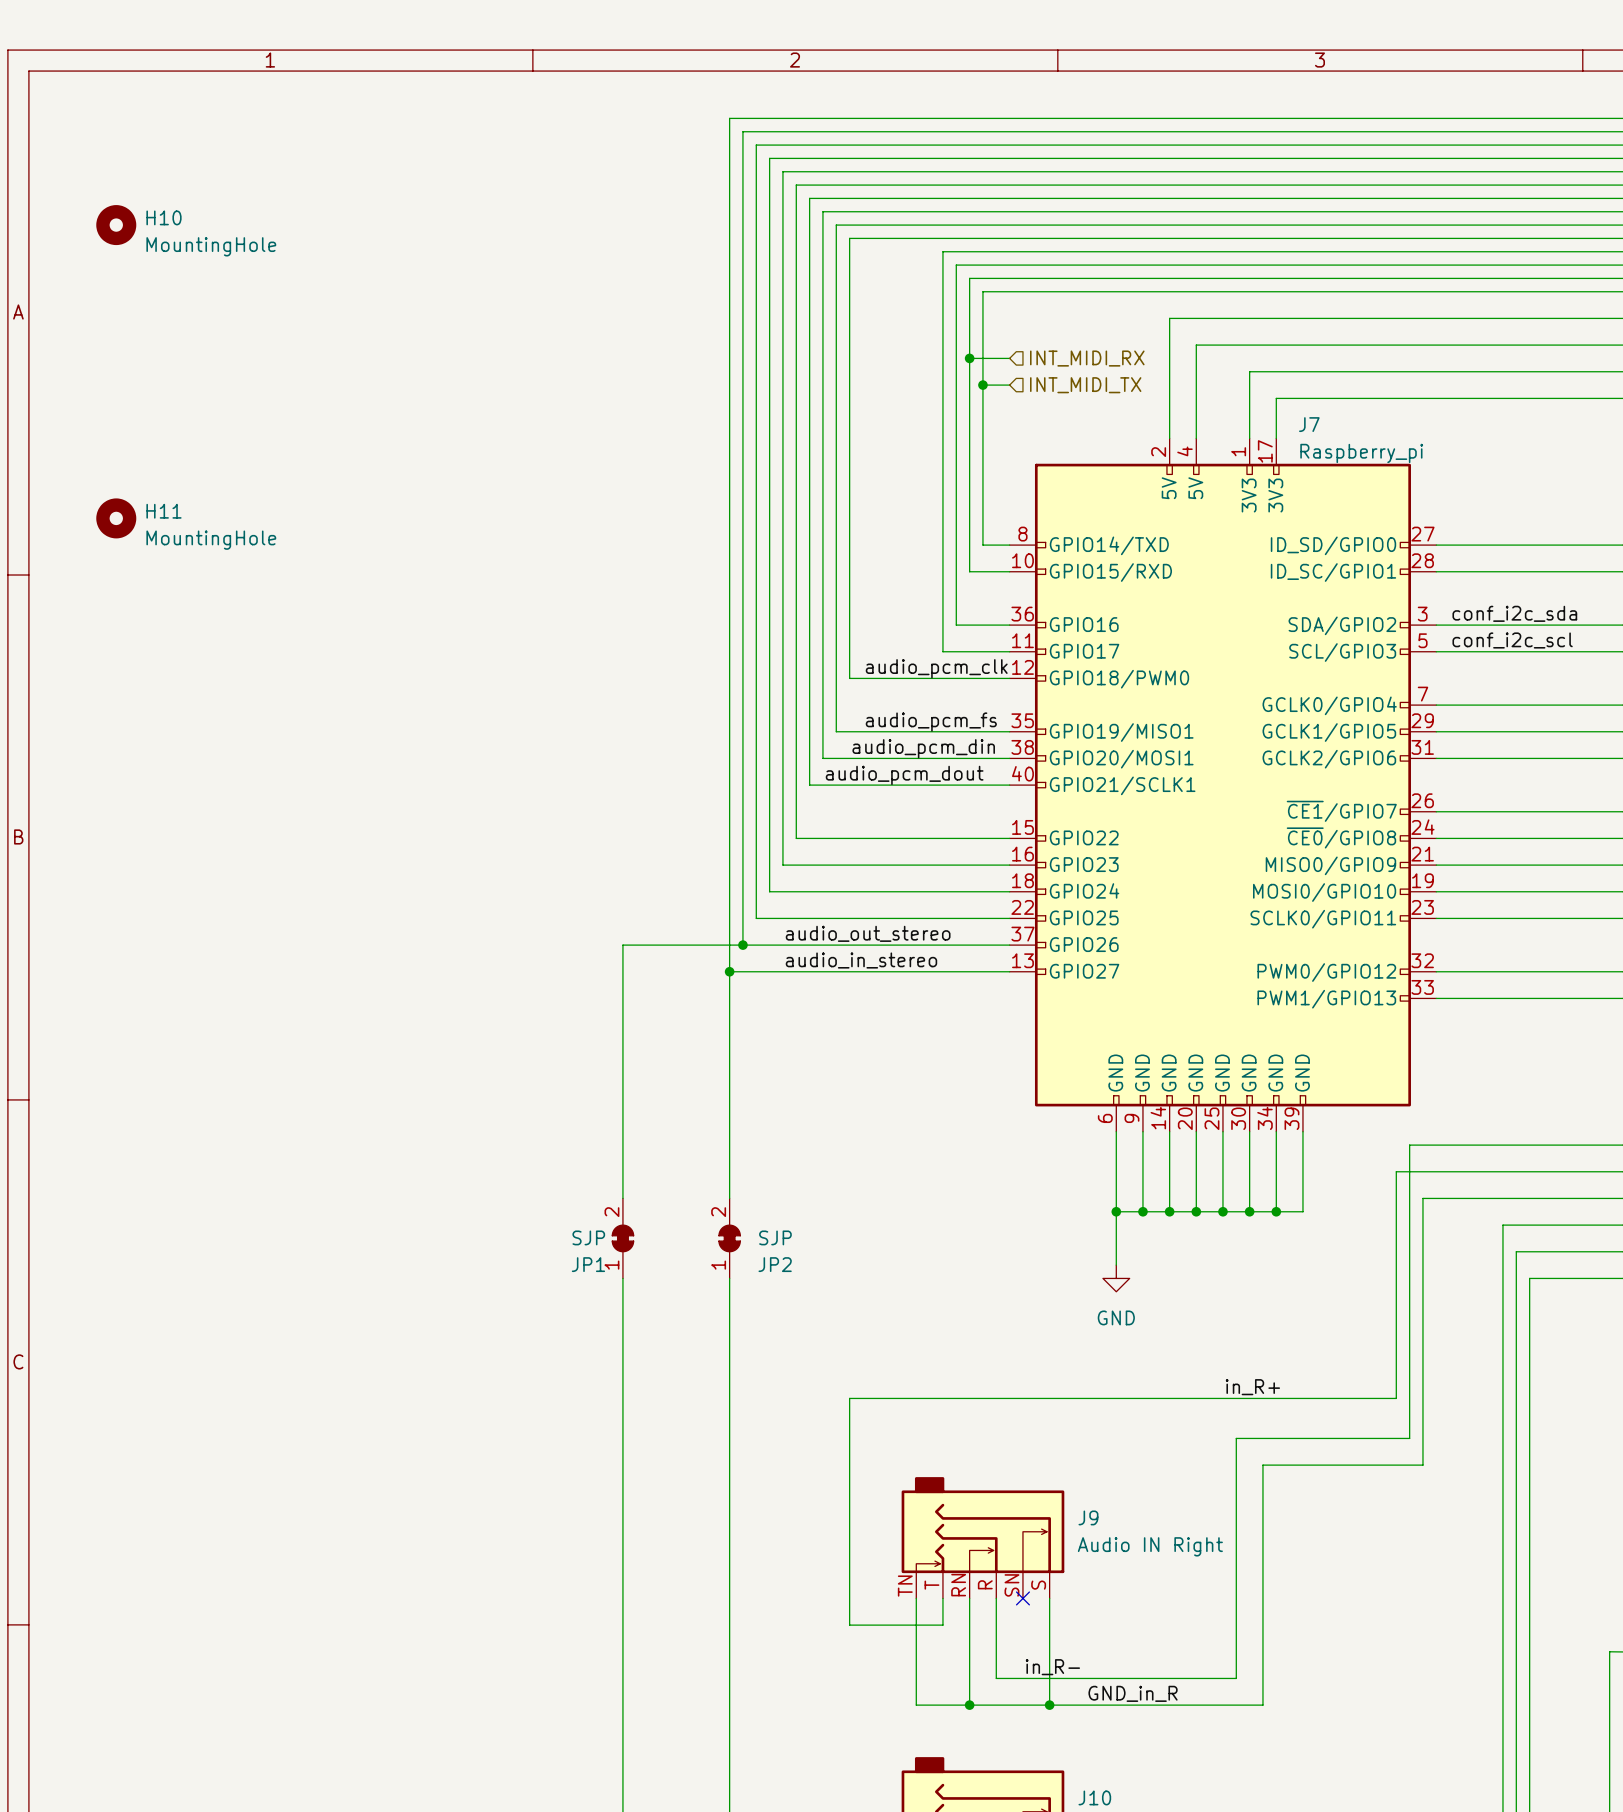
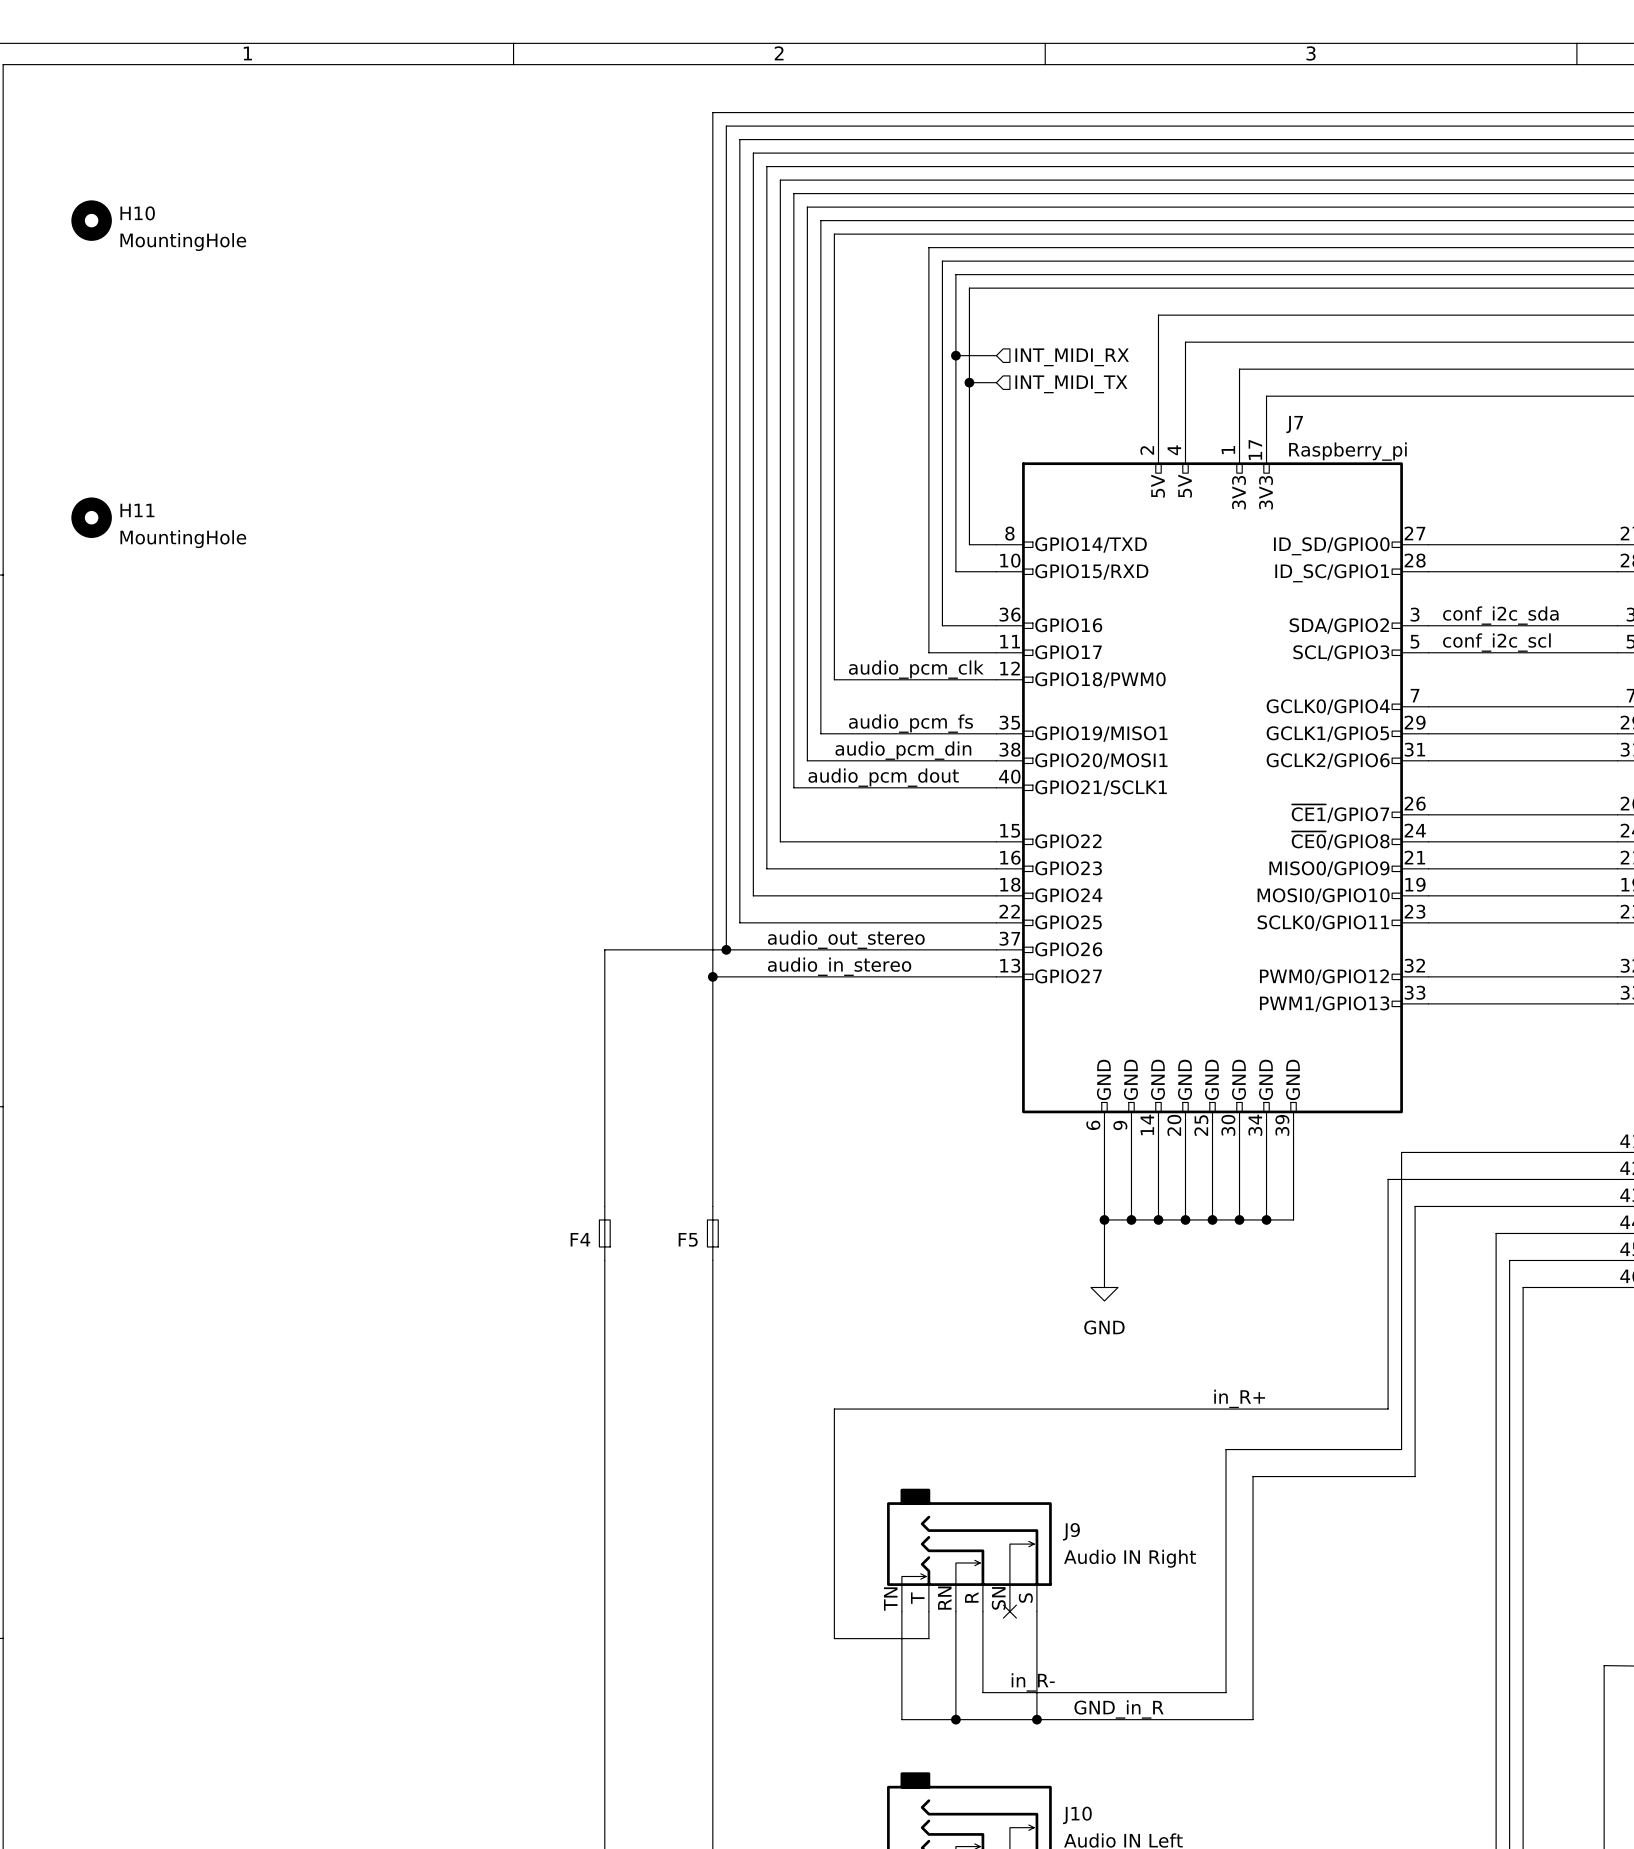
F4: none -> (604, 1233)
F5: none -> (712, 1233)
JP1: SJP (622, 1238) -> none
JP2: SJP (729, 1238) -> none

